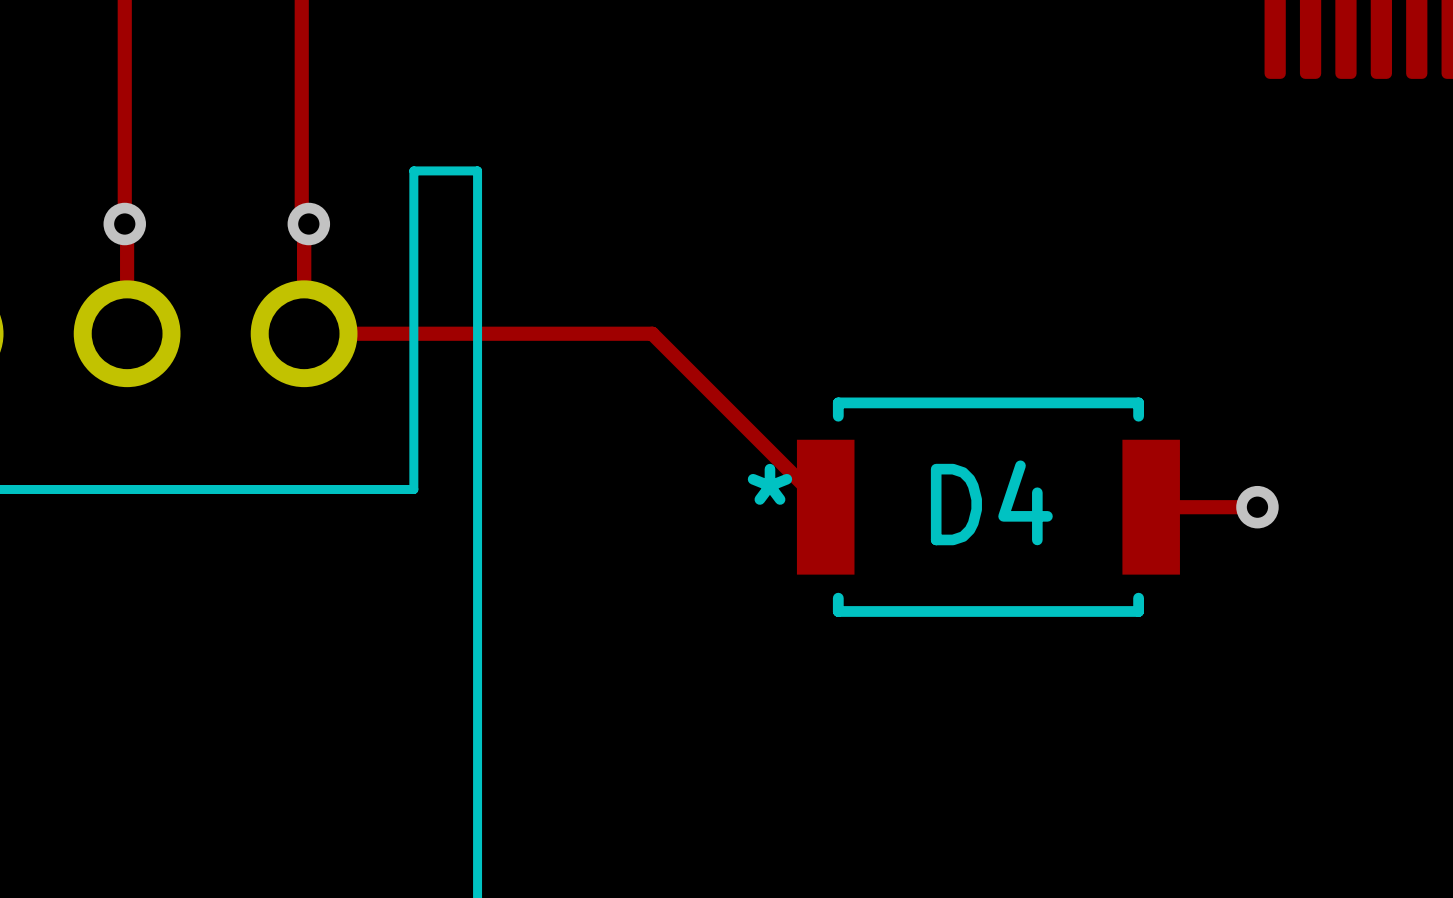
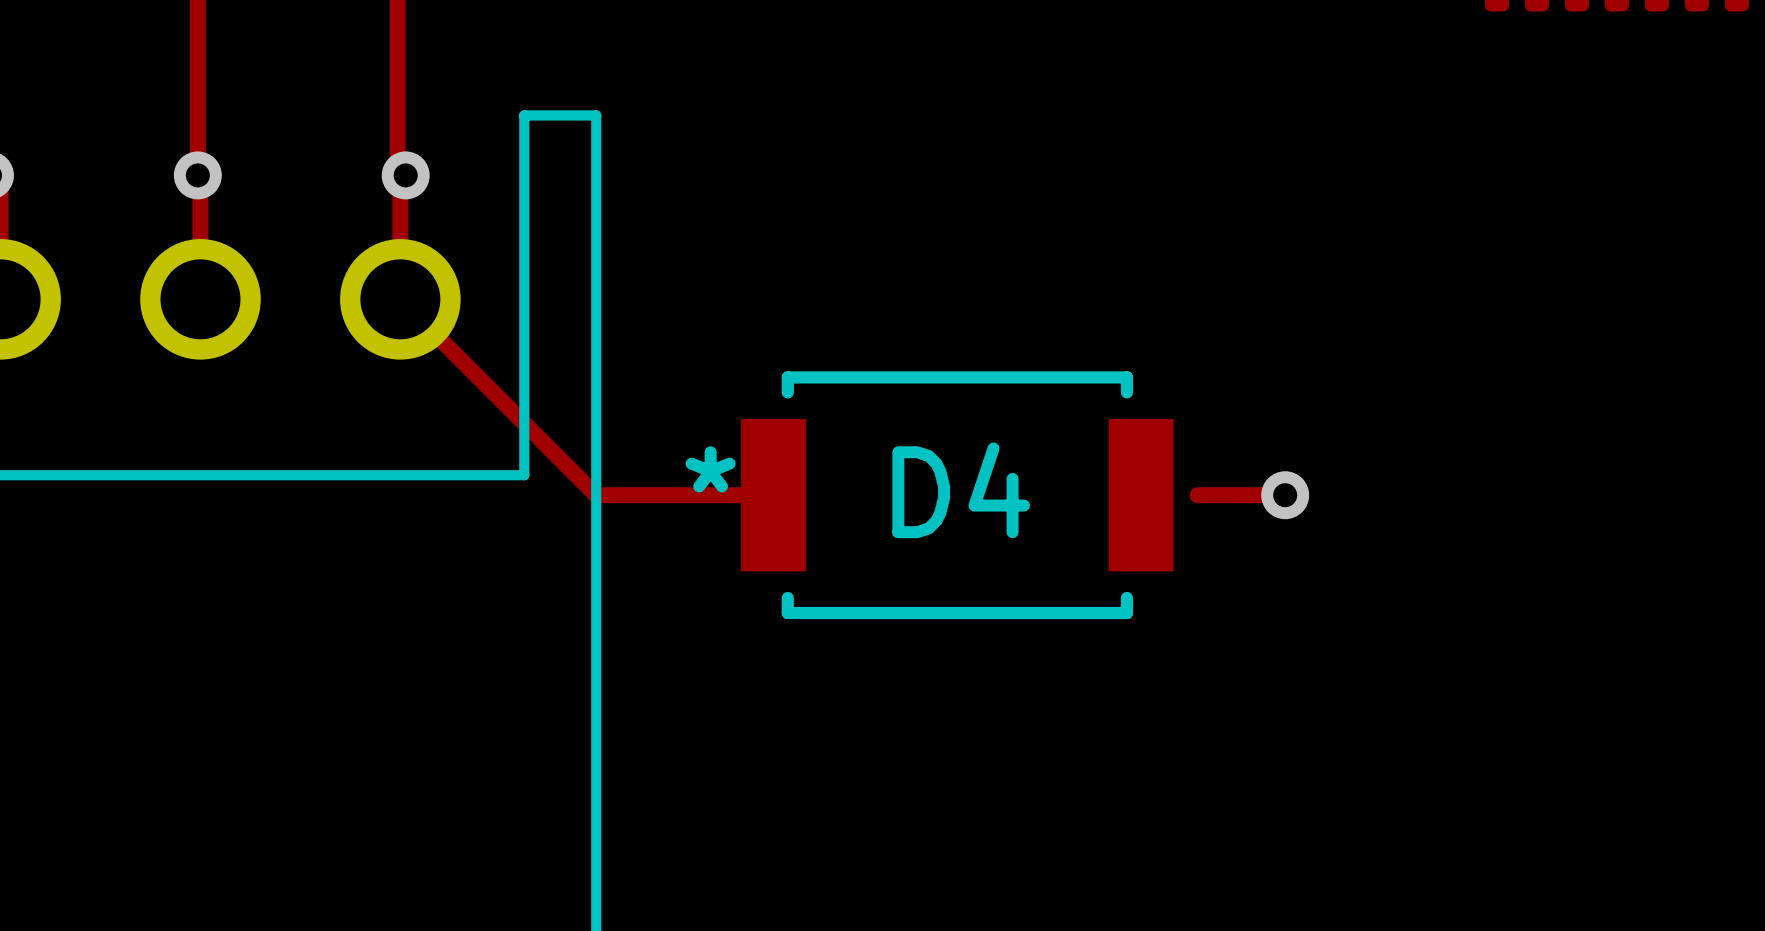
track: (304, 333) (652, 333) (825, 507) -> (400, 299) (596, 495) (773, 495)
D4 position: (988, 507) -> (957, 495)
track: none -> (1197, 495) (1285, 495)
via: none -> (1285, 495)
track: (1151, 507) (1257, 507) -> none
via: (1257, 507) -> none

